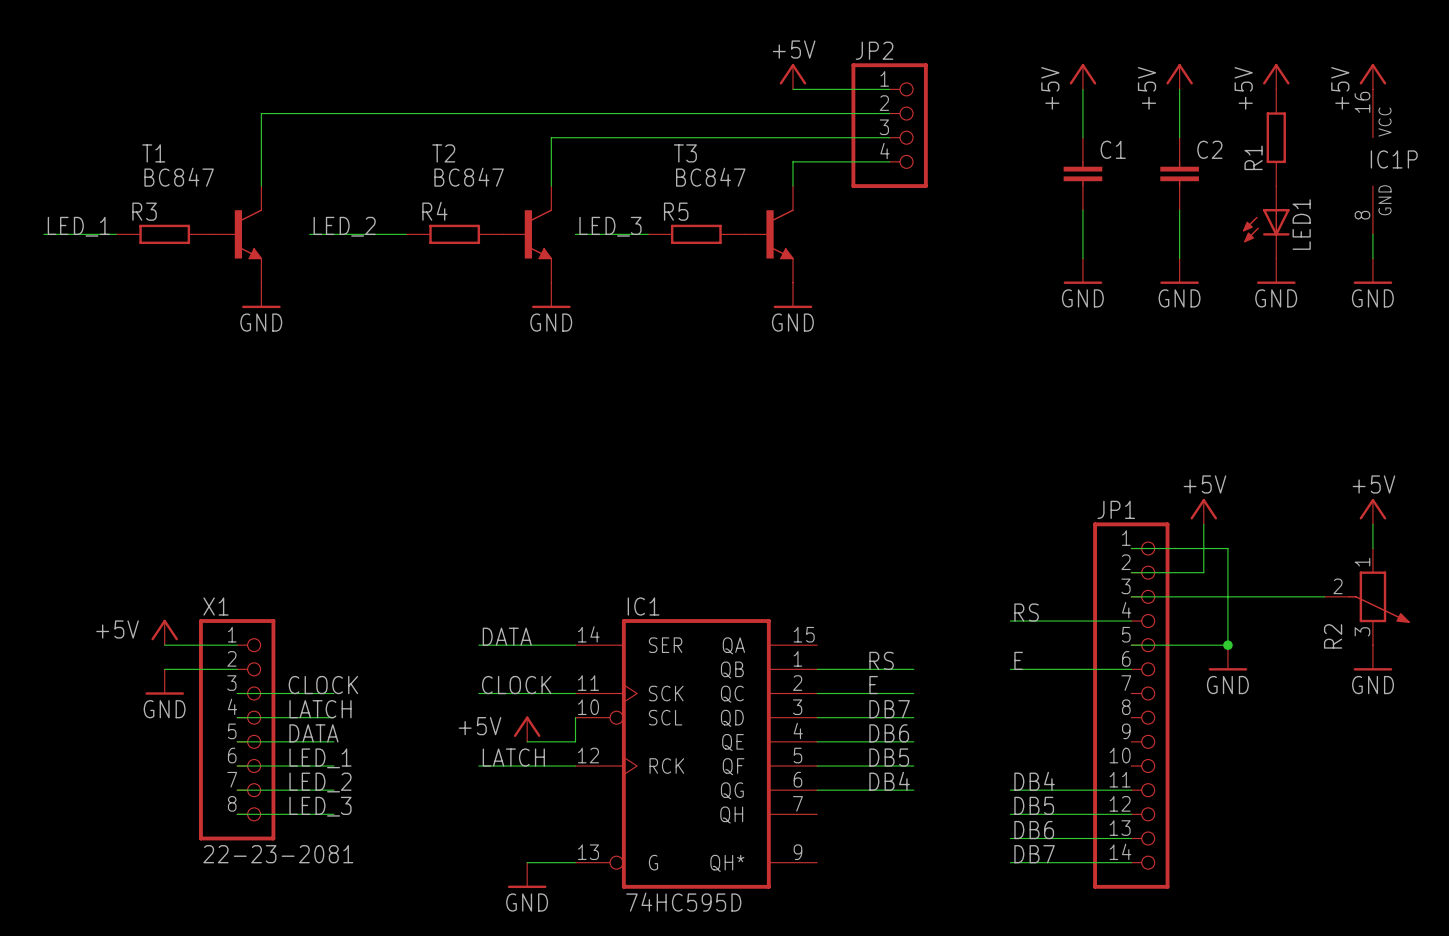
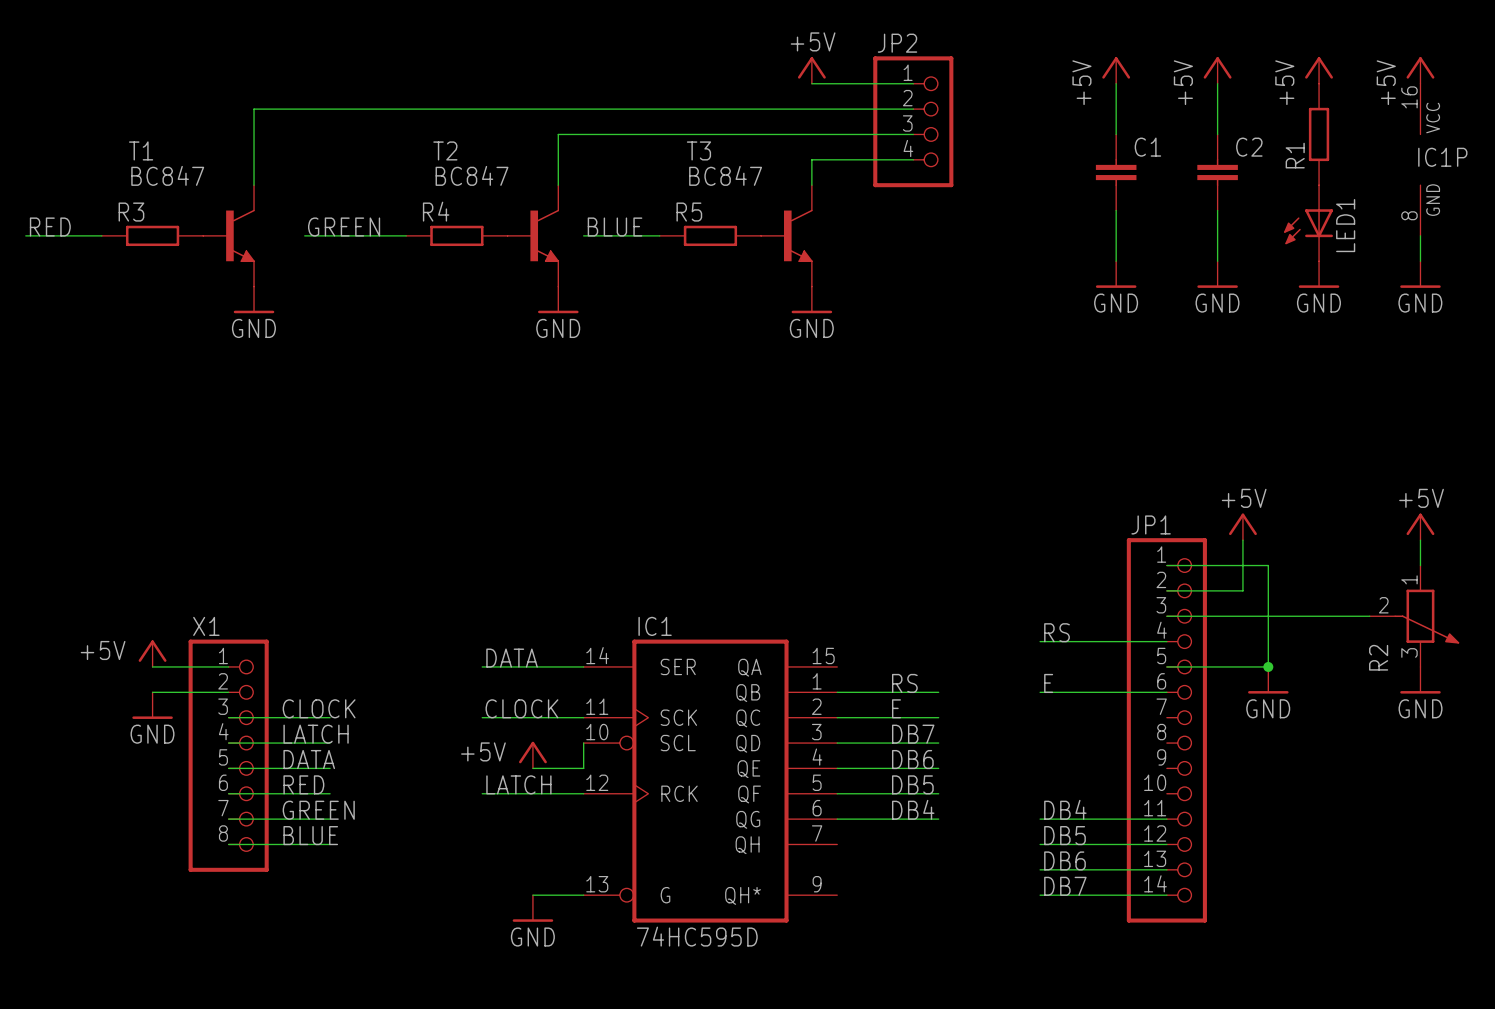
label: LED_1 (78, 226) -> RED (50, 227)
label: LED_2 (344, 226) -> GREEN (344, 227)
label: LED_3 (610, 226) -> BLUE (615, 227)
label: LED_1 (320, 758) -> RED (303, 784)
label: LED_2 (320, 782) -> GREEN (318, 810)
label: LED_3 (320, 806) -> BLUE (310, 835)
X1 value: 22-23-2081 (278, 854) -> none

